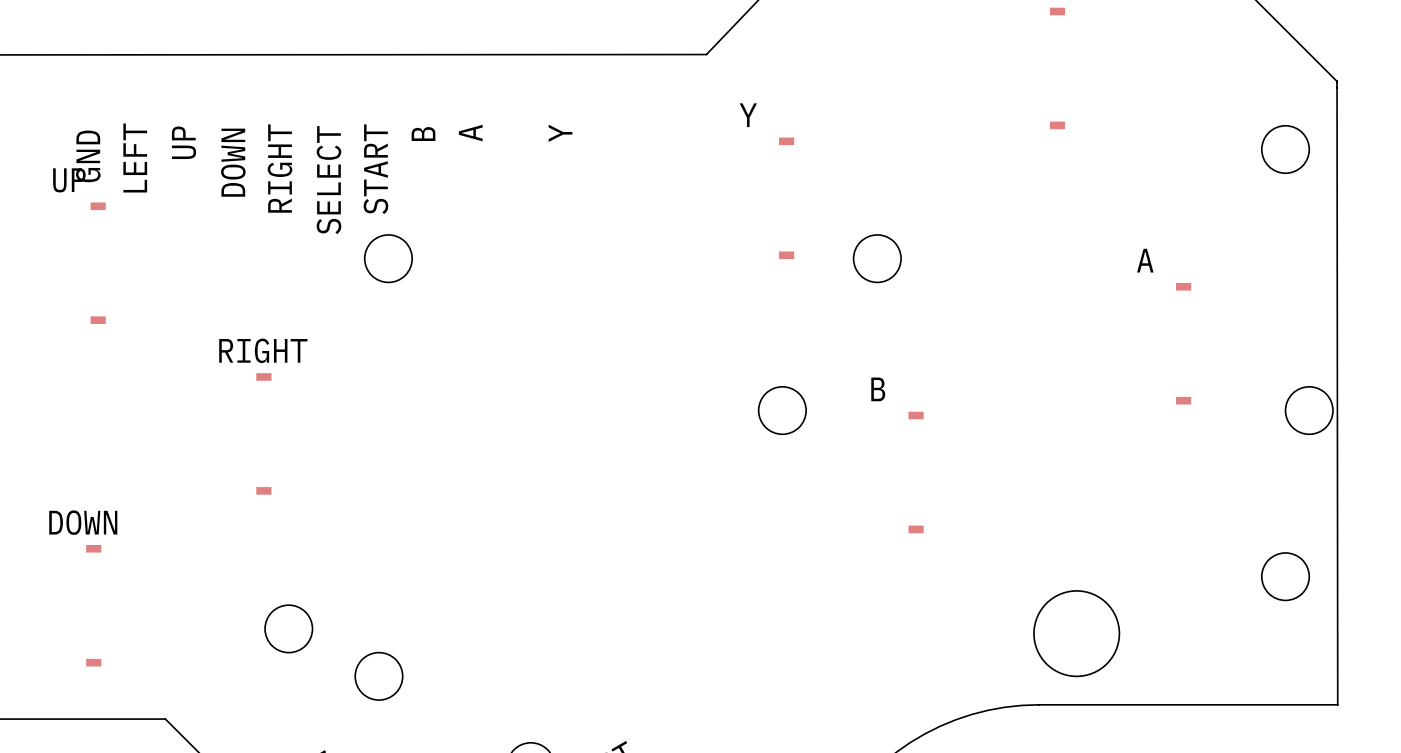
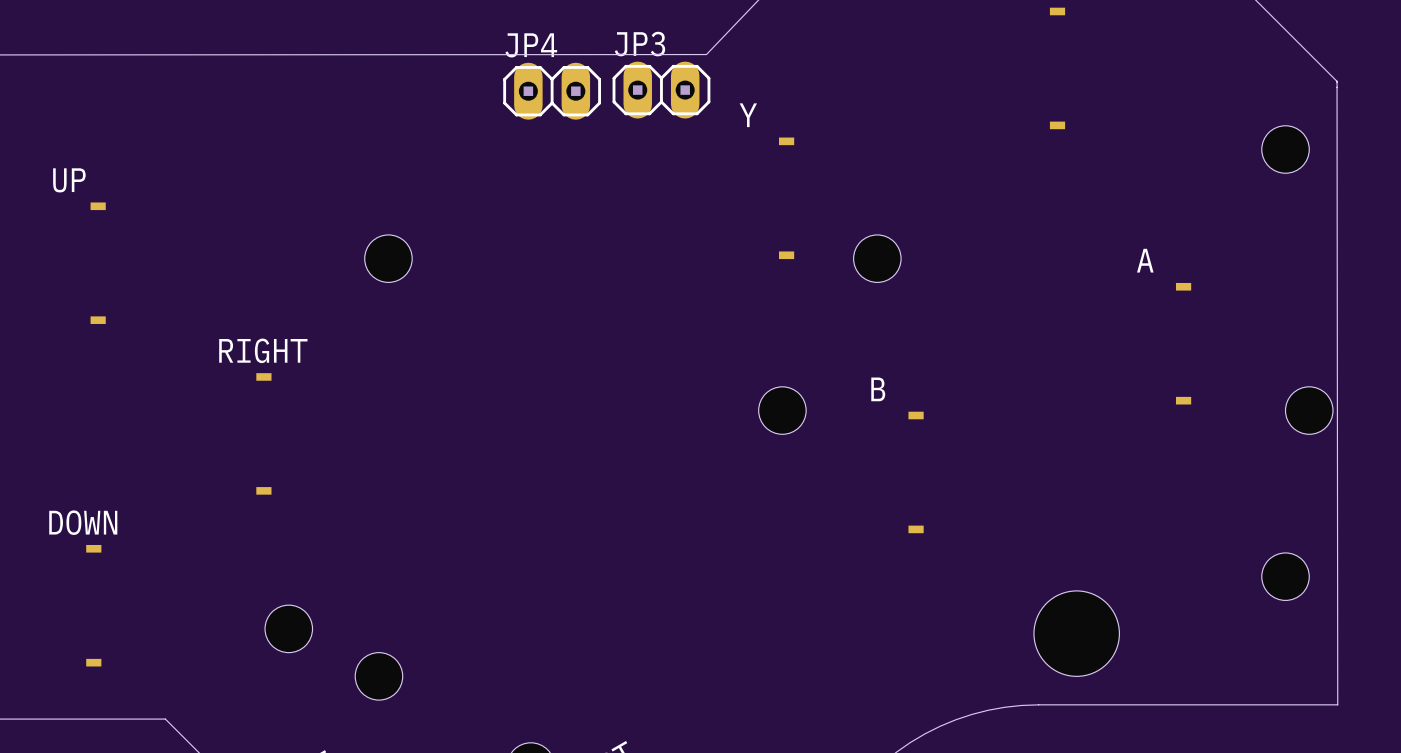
JP3: none -> (661, 90)
JP4: none -> (552, 91)
text: A (470, 133) -> none
text: Y (560, 133) -> none
text: B (423, 134) -> none
text: UP (184, 142) -> none
text: GND (88, 156) -> none
text: LEFT (135, 157) -> none
text: DOWN (233, 162) -> none
text: RIGHT (280, 168) -> none
text: START (375, 169) -> none
text: SELECT (328, 180) -> none

